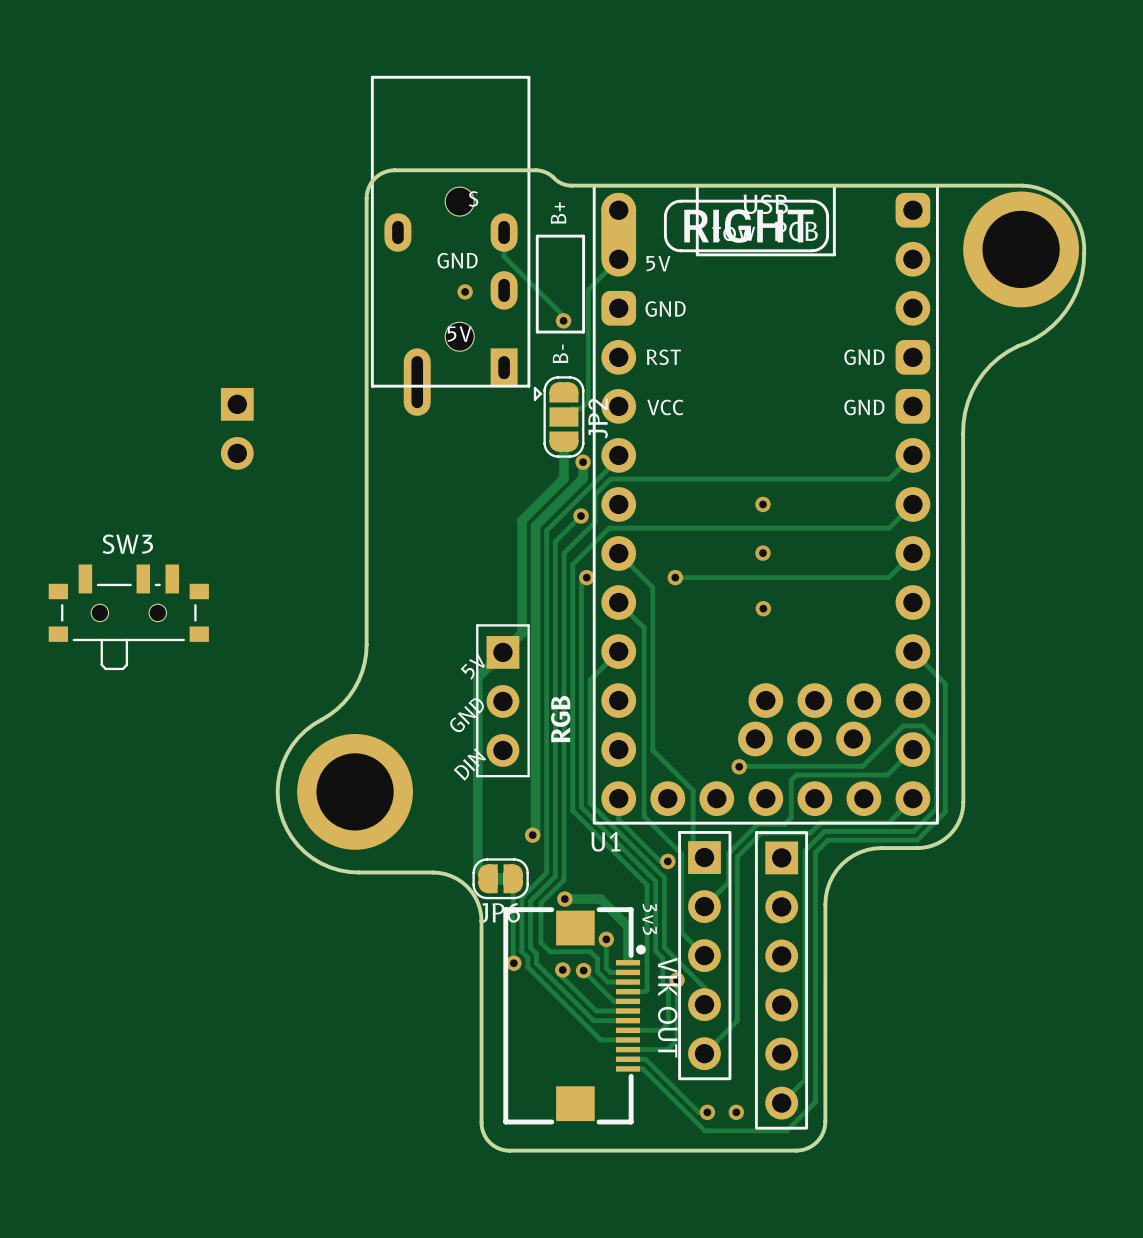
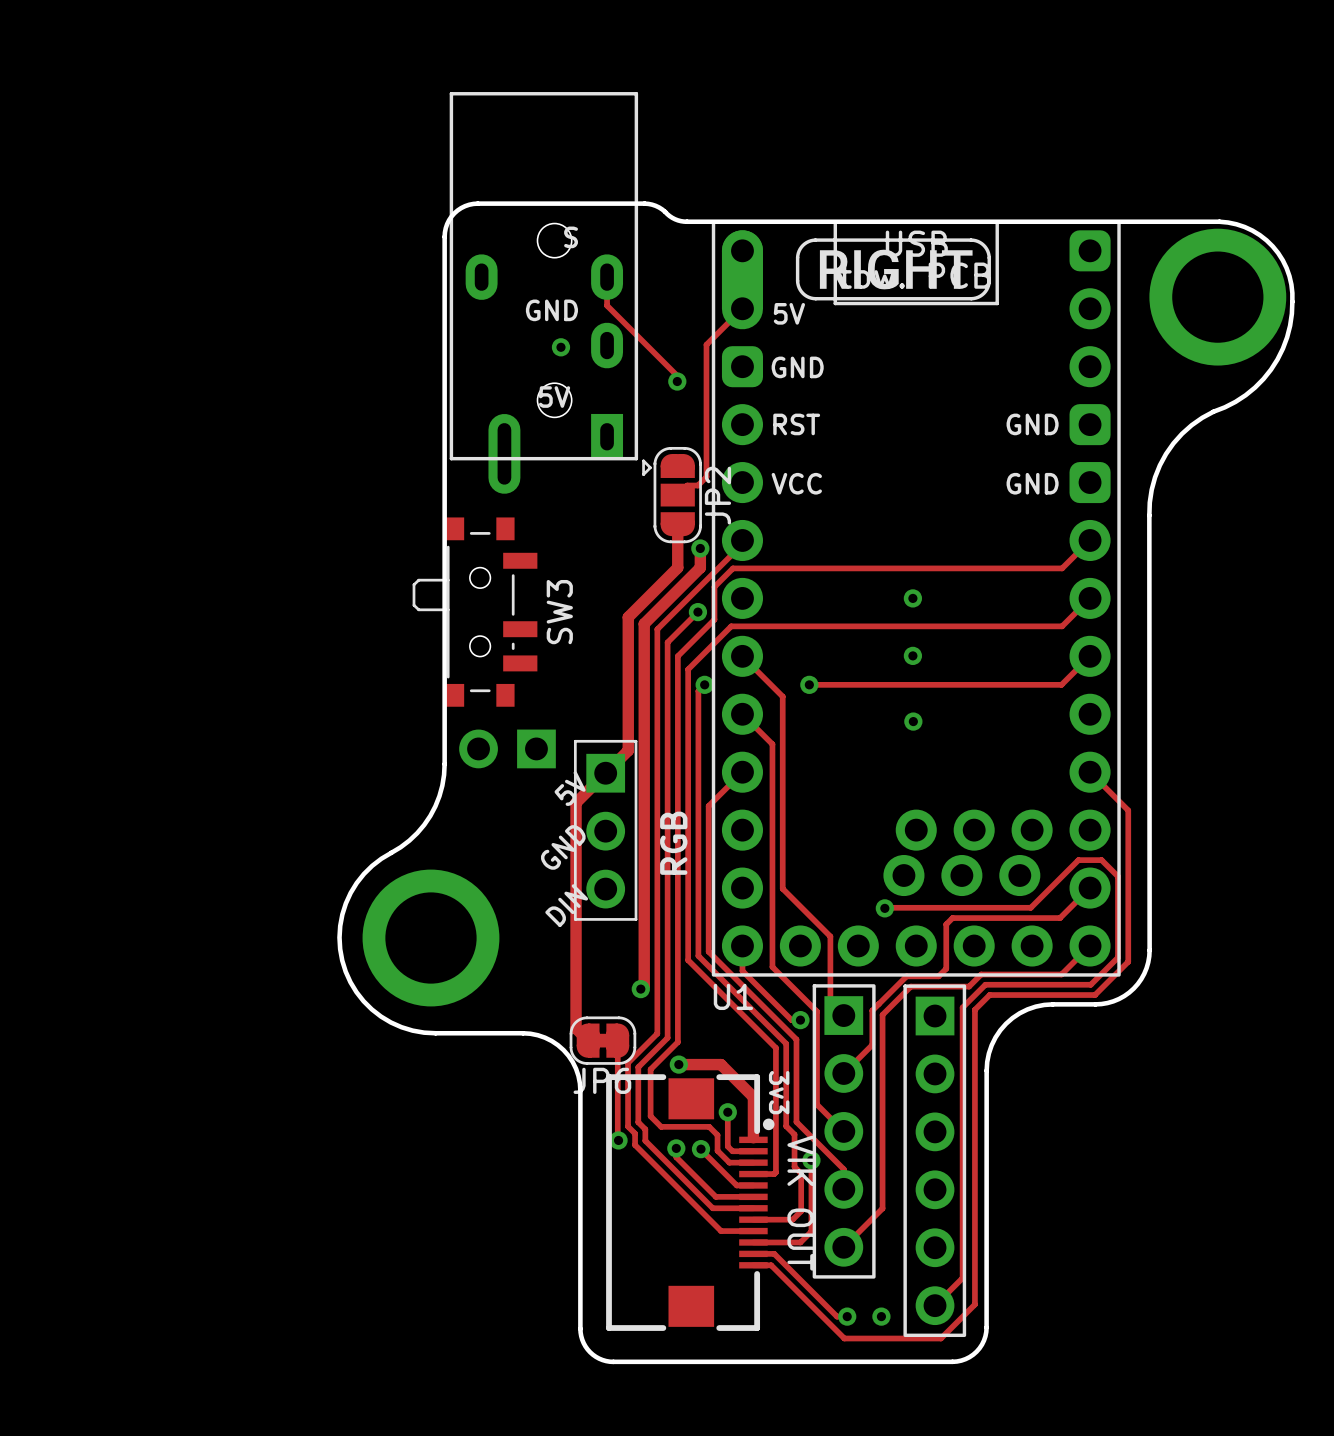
text: B+ (558, 212) -> none
line: (537, 236) (583, 236) (583, 332) (537, 332) (537, 236) -> none
text: B- (560, 353) -> none
part rotation: 0° (237, 428) -> 90° clockwise (507, 748)
part position: (237, 428) -> (507, 748)
SW3 rotation: 0° (128, 617) -> 90° clockwise (475, 612)
SW3 position: (128, 617) -> (475, 612)

